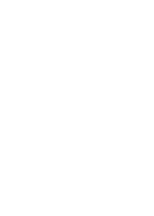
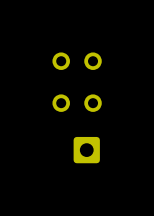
part: none -> (77, 61)
part: none -> (77, 103)
part: none -> (86, 150)

